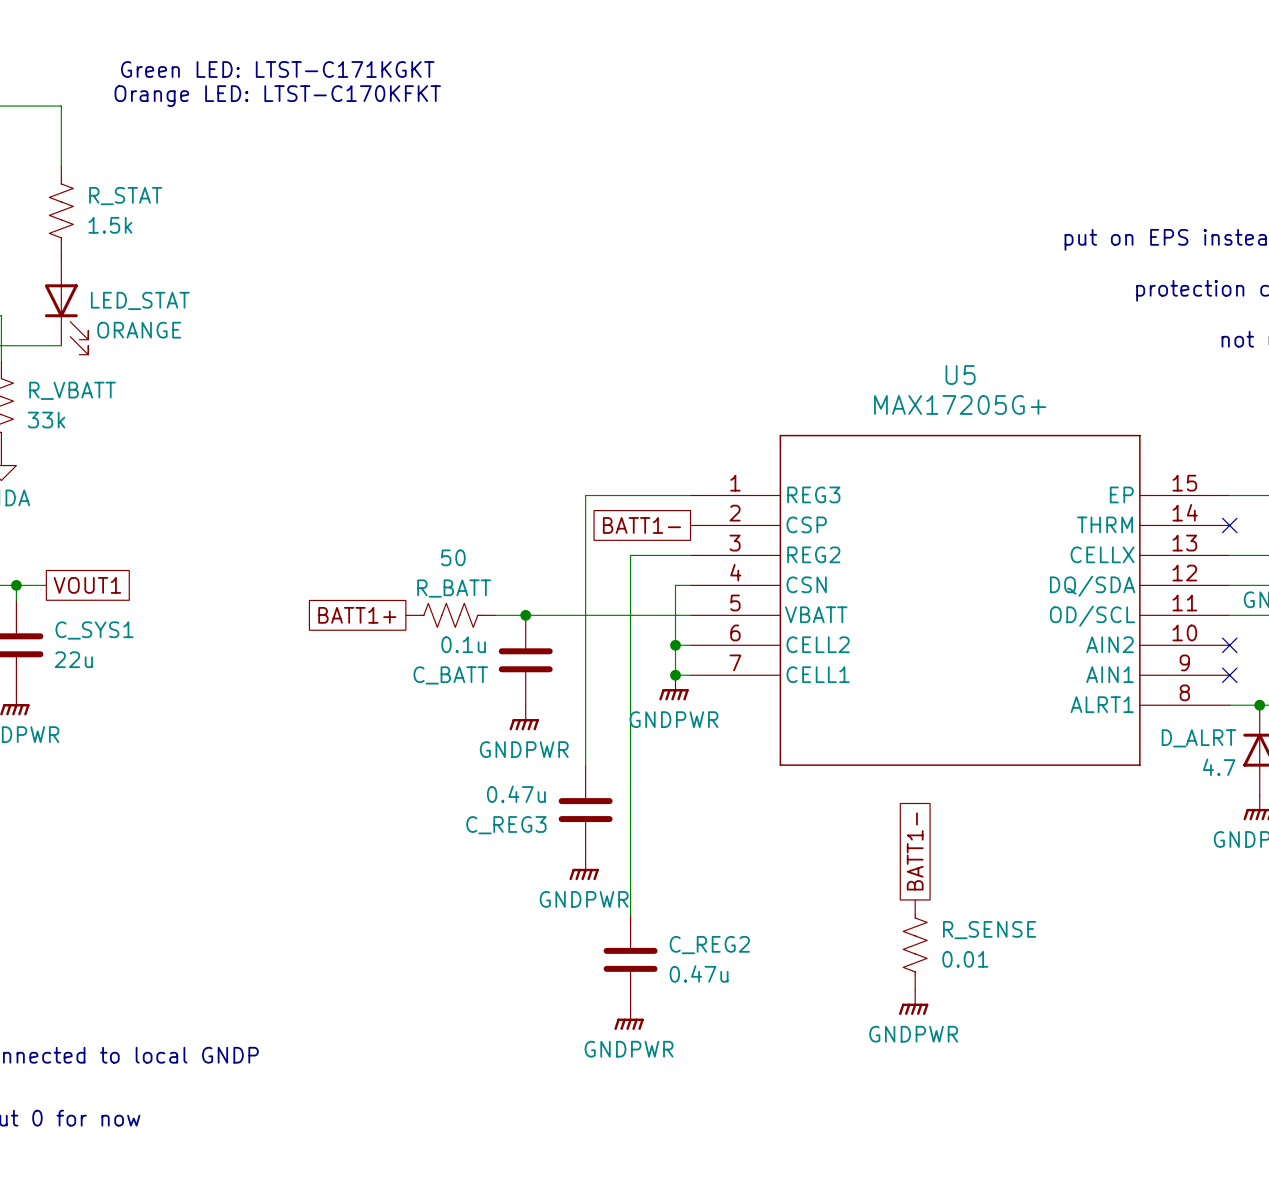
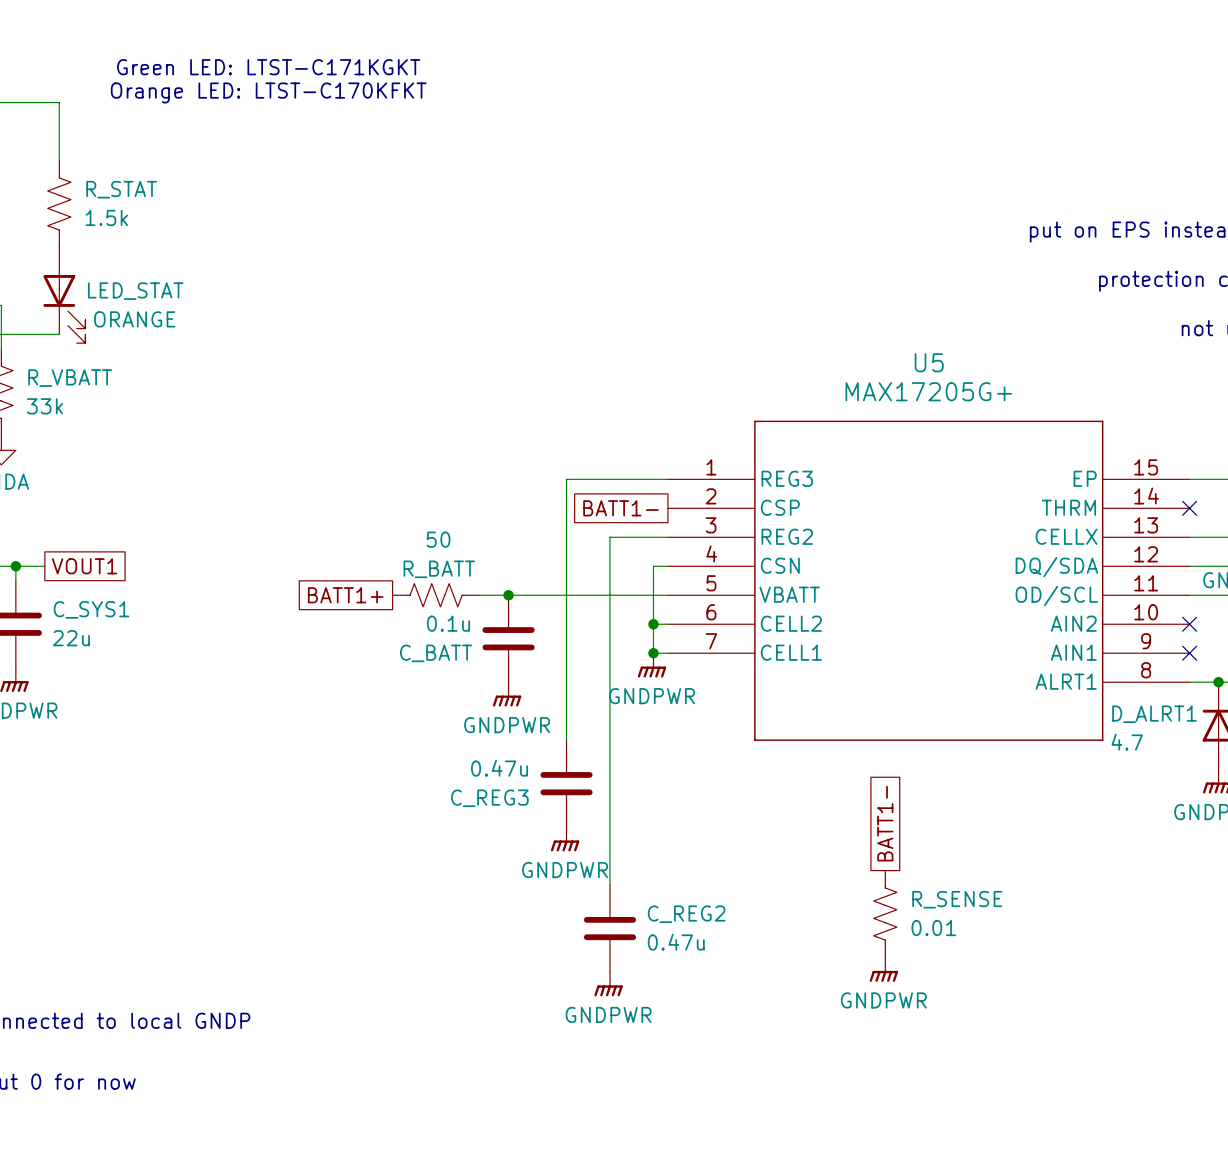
D_ALRT name: D_ALRT (1198, 738) -> D_ALRT1 (1154, 714)
D_ALRT value position: 4.7 (1219, 767) -> 4.7 (1127, 742)

